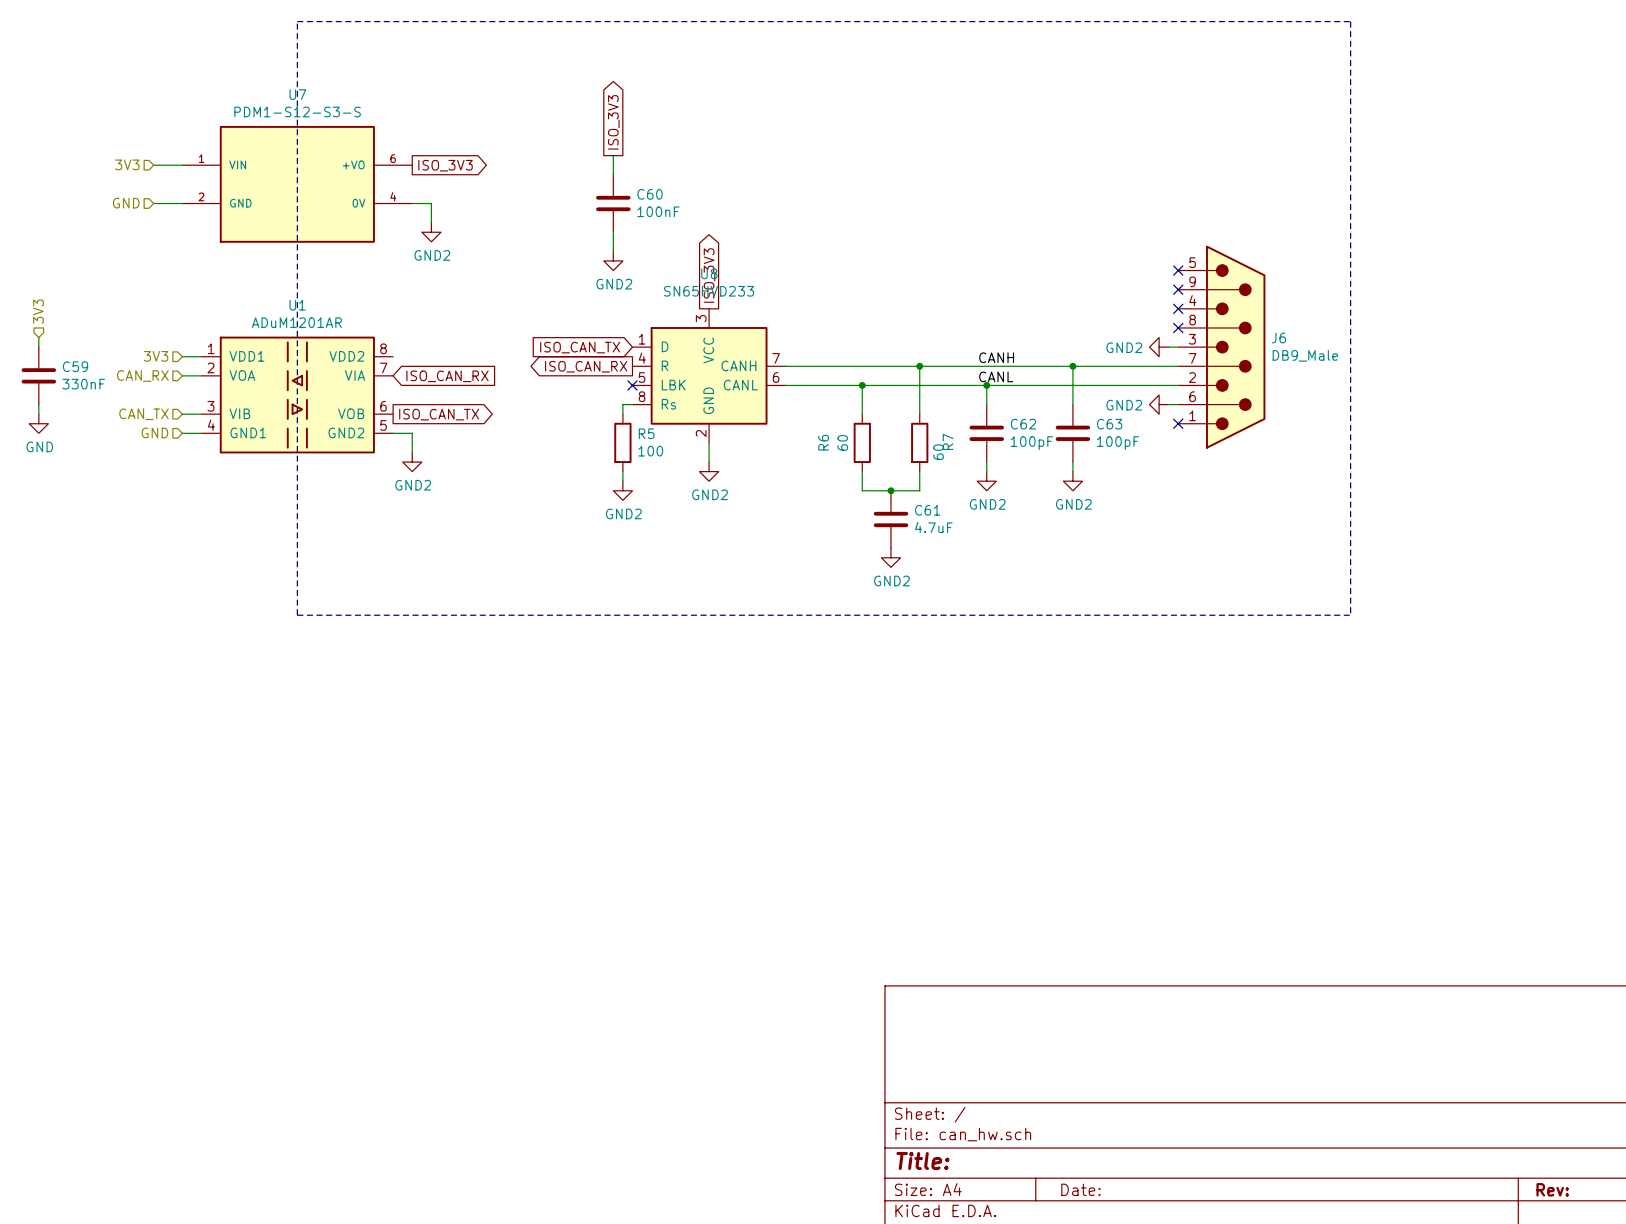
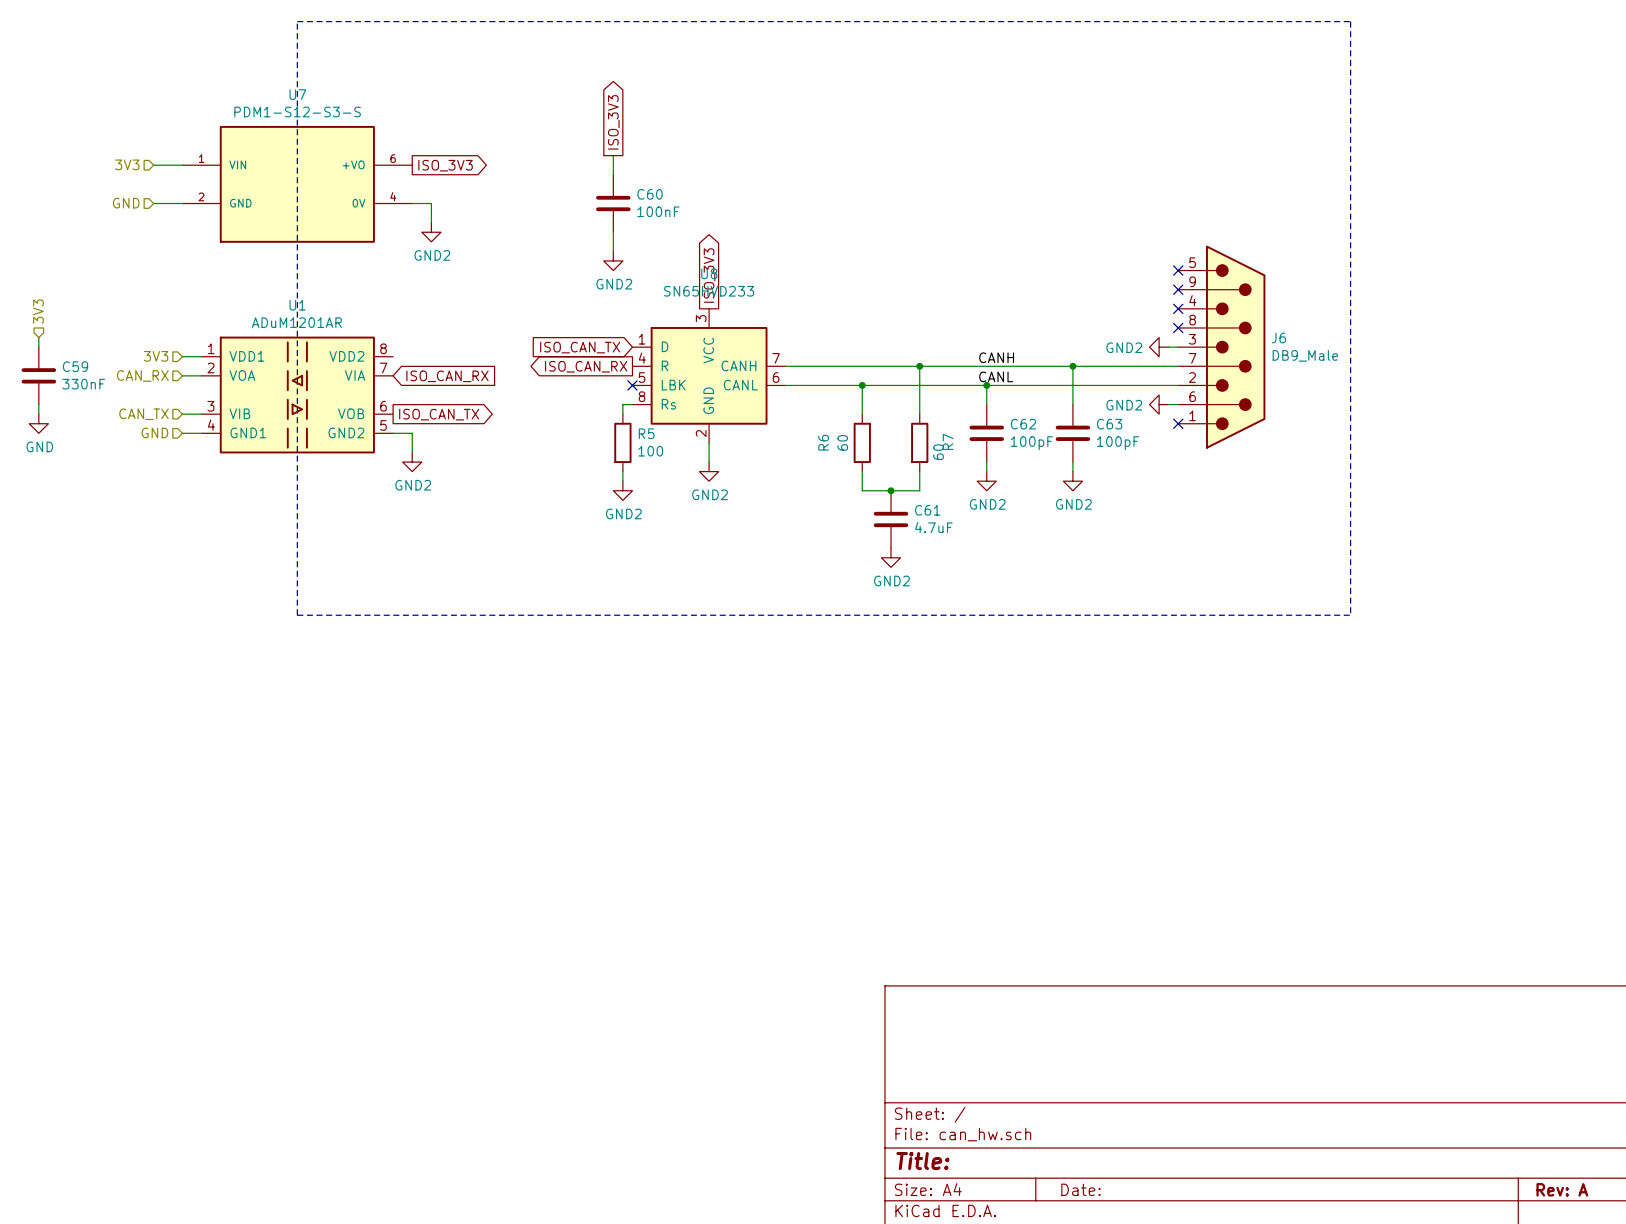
title block: Rev: (1552, 1189) -> Rev: A (1562, 1189)

